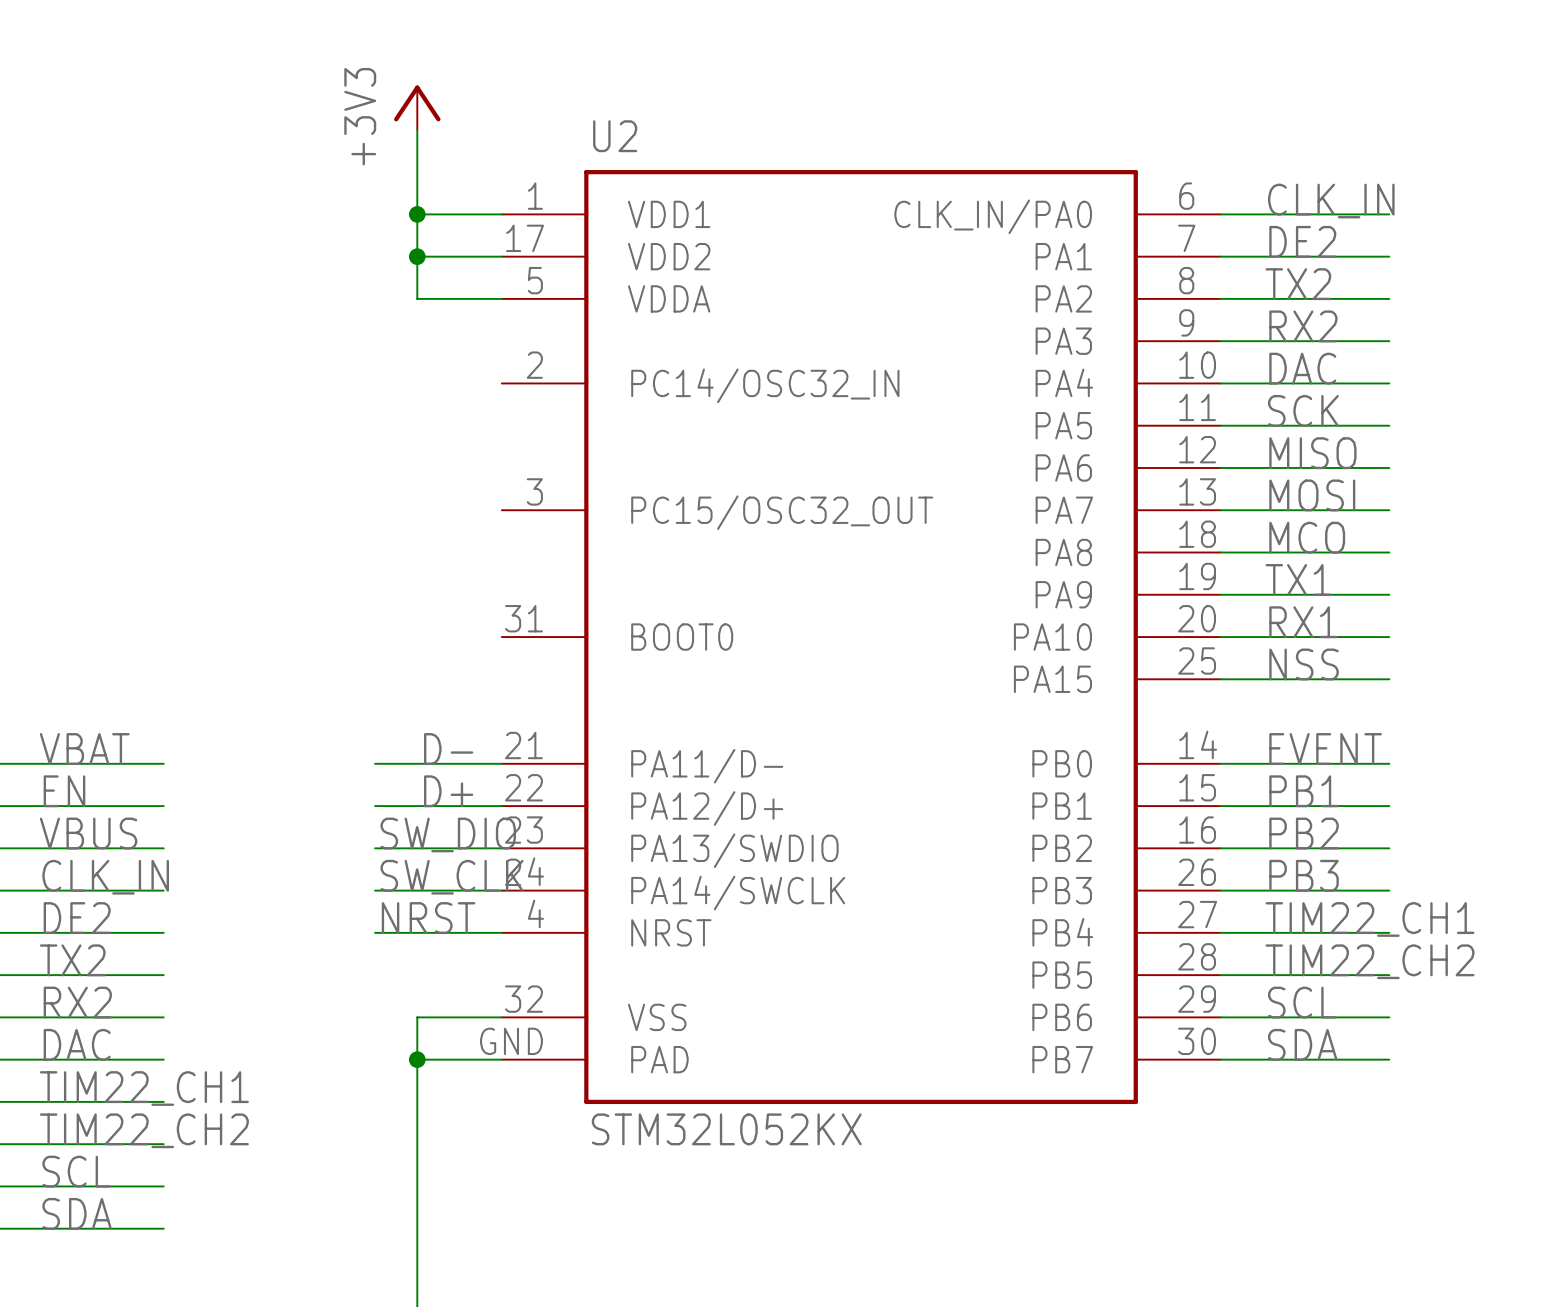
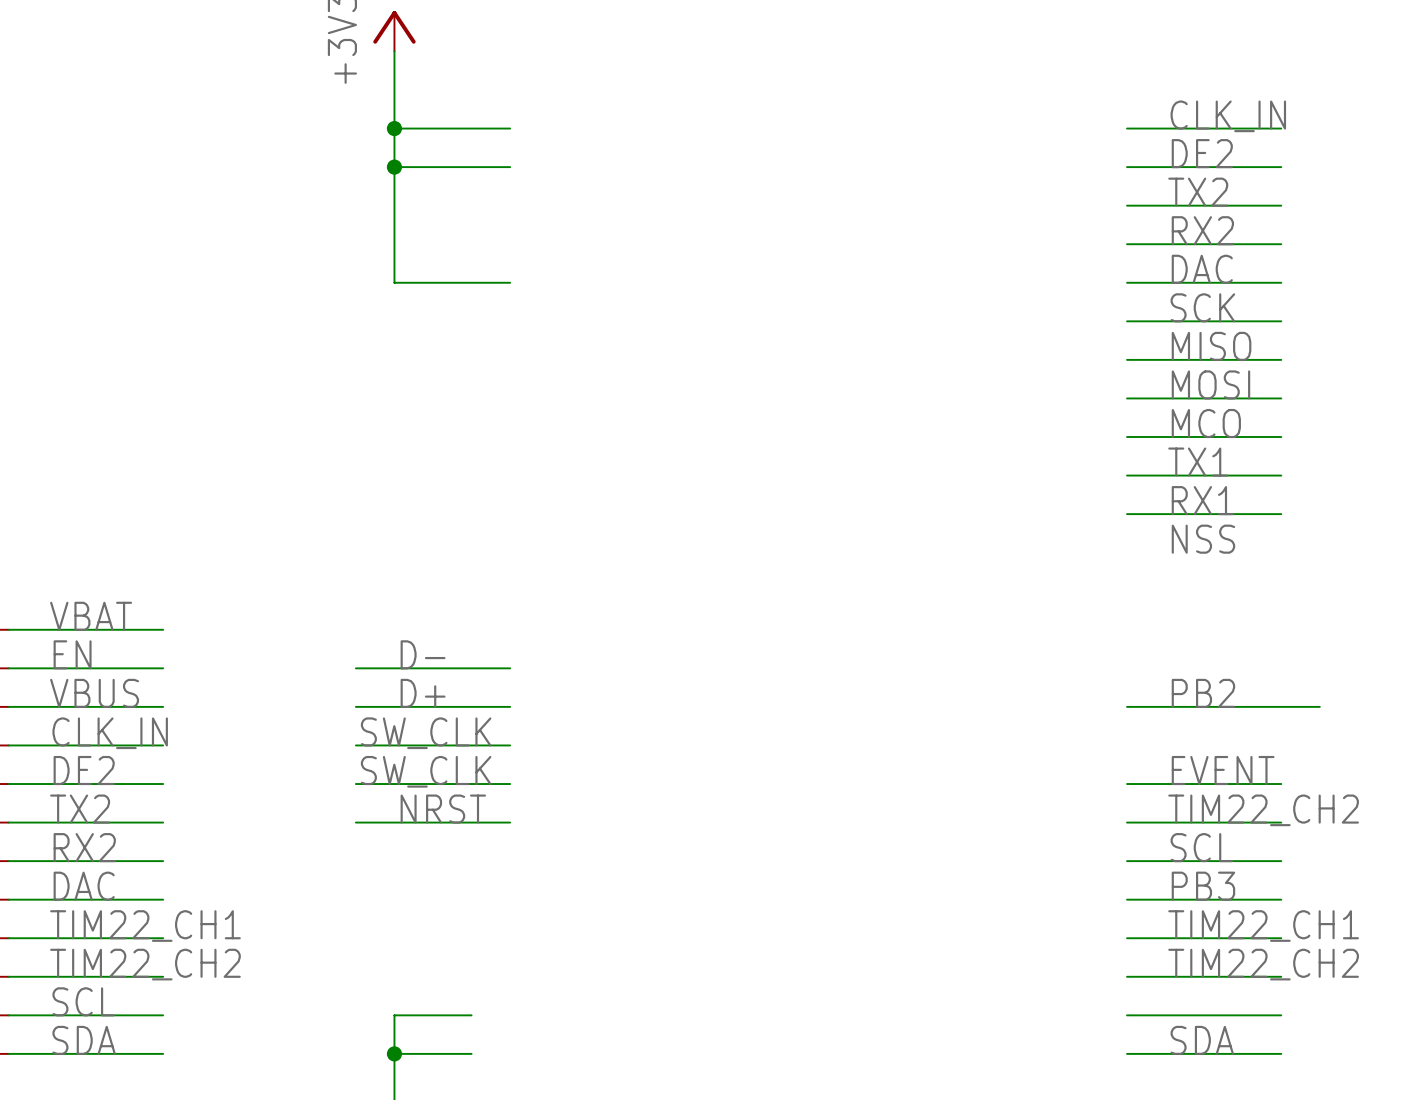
wire: (417, 298) (501, 298) -> (394, 205) (394, 282) (510, 282)
U2: STM32L052KX (861, 637) -> none
wire: (1220, 679) (1389, 679) -> none
label: D- (448, 749) -> none
label: EVENT (1325, 749) -> none
wire: (375, 763) (501, 763) -> none
wire: (1220, 763) (1389, 763) -> (1127, 938) (1281, 938)
label: D+ (448, 791) -> D- (423, 654)
label: PB1 (1304, 791) -> none
wire: (1220, 806) (1389, 806) -> (1127, 976) (1281, 976)
label: none -> D+ (423, 693)
label: SW_DIO (448, 834) -> none
wire: none -> (1281, 706) (1319, 706)
label: PB3 (1304, 875) -> none
wire: (1220, 890) (1389, 890) -> (1127, 1053) (1281, 1053)
label: NRST (428, 918) -> SW_CLK (426, 771)
label: TIM22_CH1 (1369, 919) -> EVENT (1223, 770)
label: none -> NRST (443, 809)
wire: none -> (355, 822) (510, 822)
wire: (501, 1017) (417, 1017) (417, 1186) -> (471, 1015) (394, 1015)
label: SDA (1302, 1044) -> PB3 (1203, 886)
wire: (417, 1059) (501, 1059) -> (394, 1053) (471, 1053)
junction: (417, 1059) -> none
label: none -> TIM22_CH1 (1263, 926)
label: none -> TIM22_CH2 (1263, 964)
wire: none -> (1127, 1015) (1281, 1015)
label: none -> SDA (1202, 1040)
junction: none -> (394, 1053)

